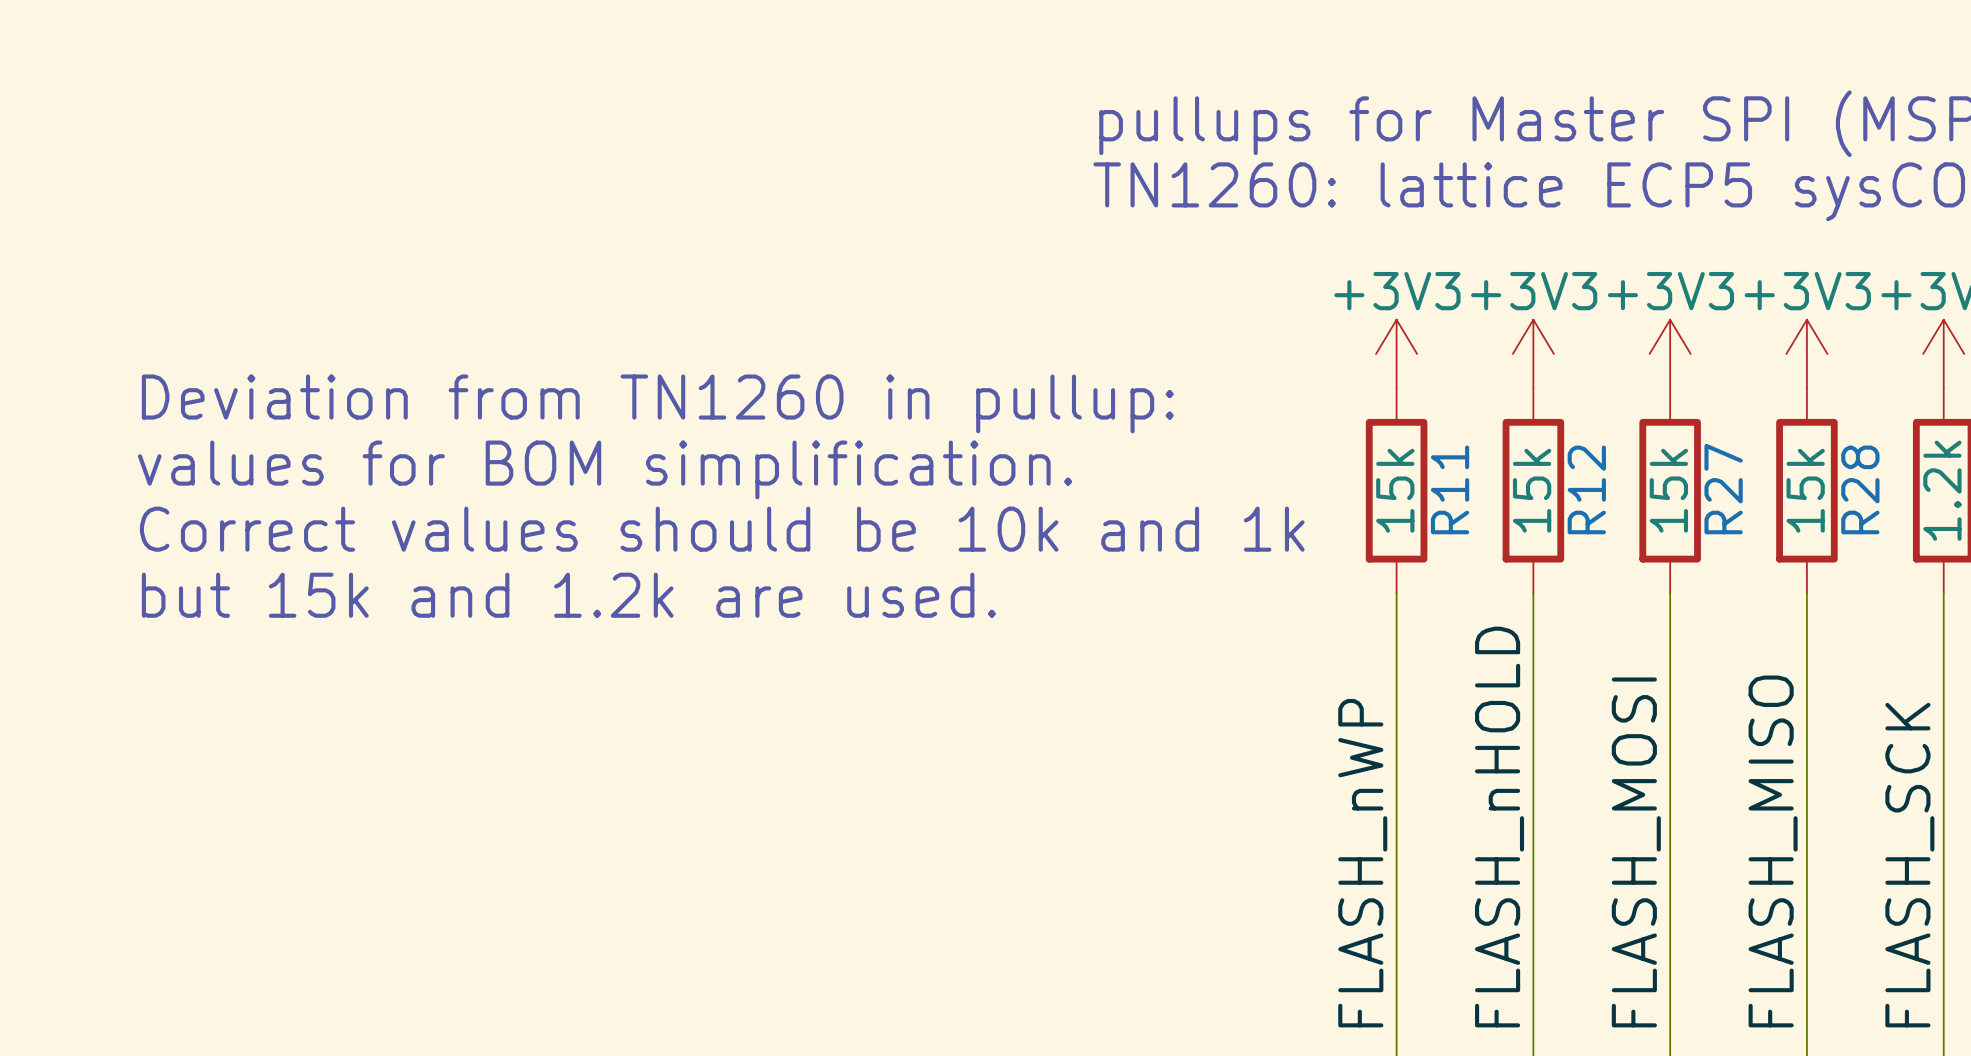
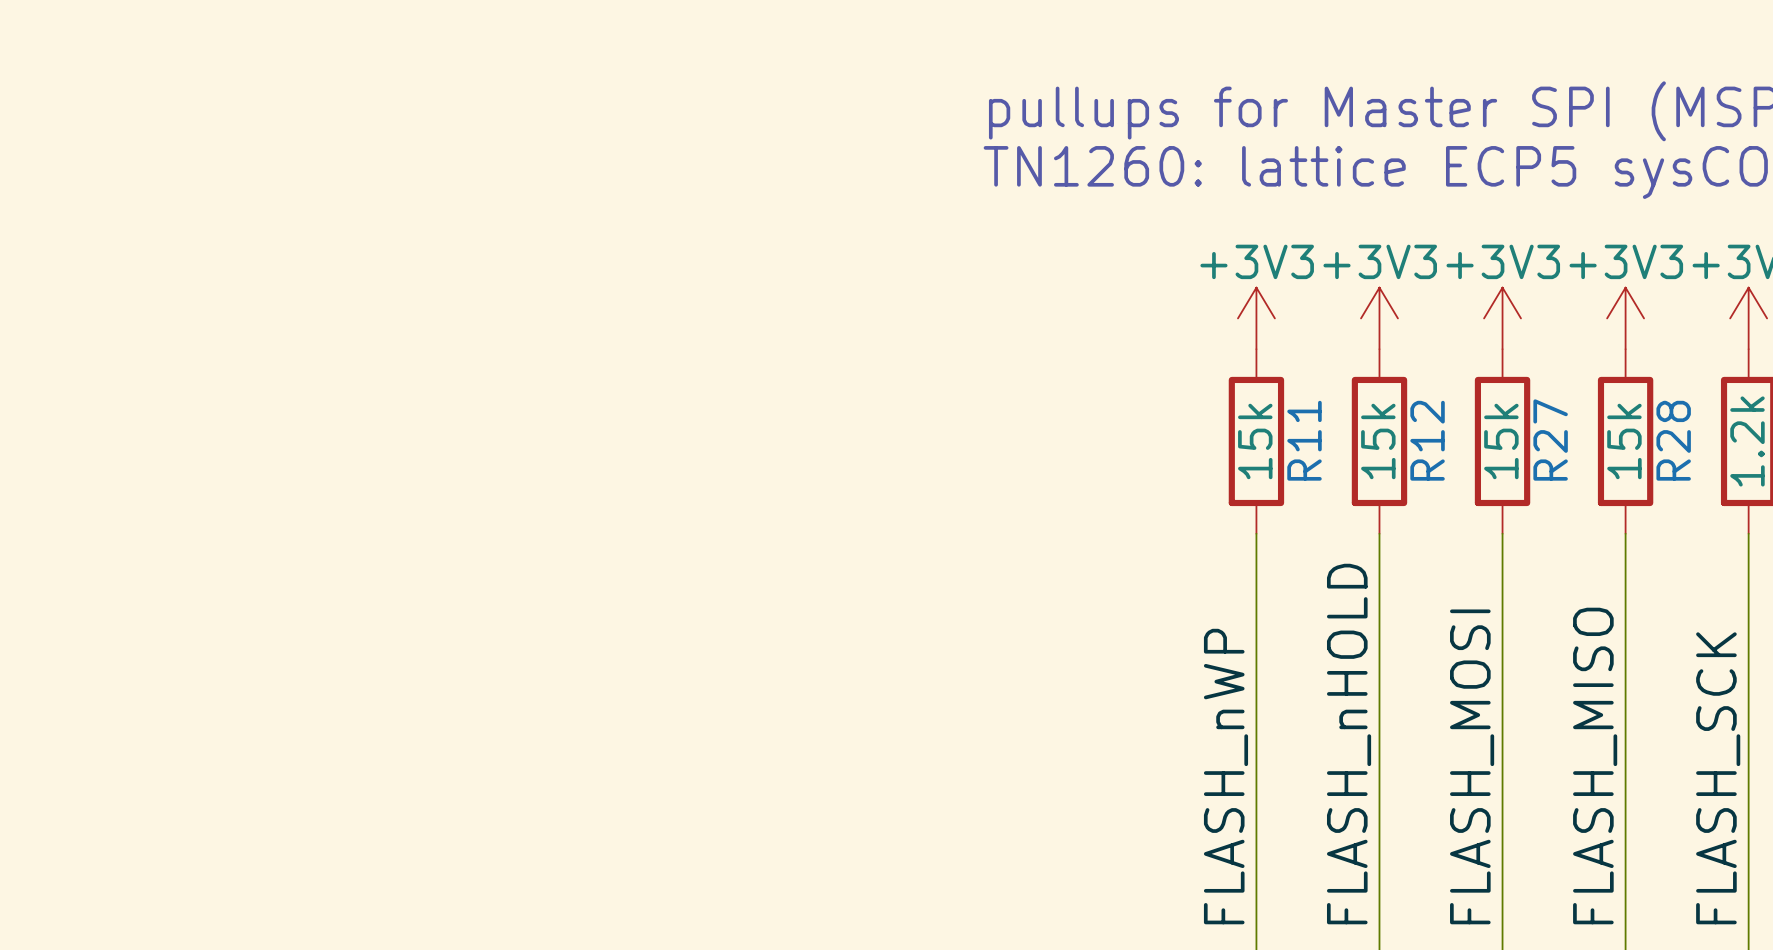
text: Deviation from TN1260 in pullup: (657, 403) -> none
text: values for BOM simplification. (605, 469) -> none
text: Correct values should be 10k and 1k (722, 529) -> none
text: but 15k and 1.2k are used. (568, 595) -> none

